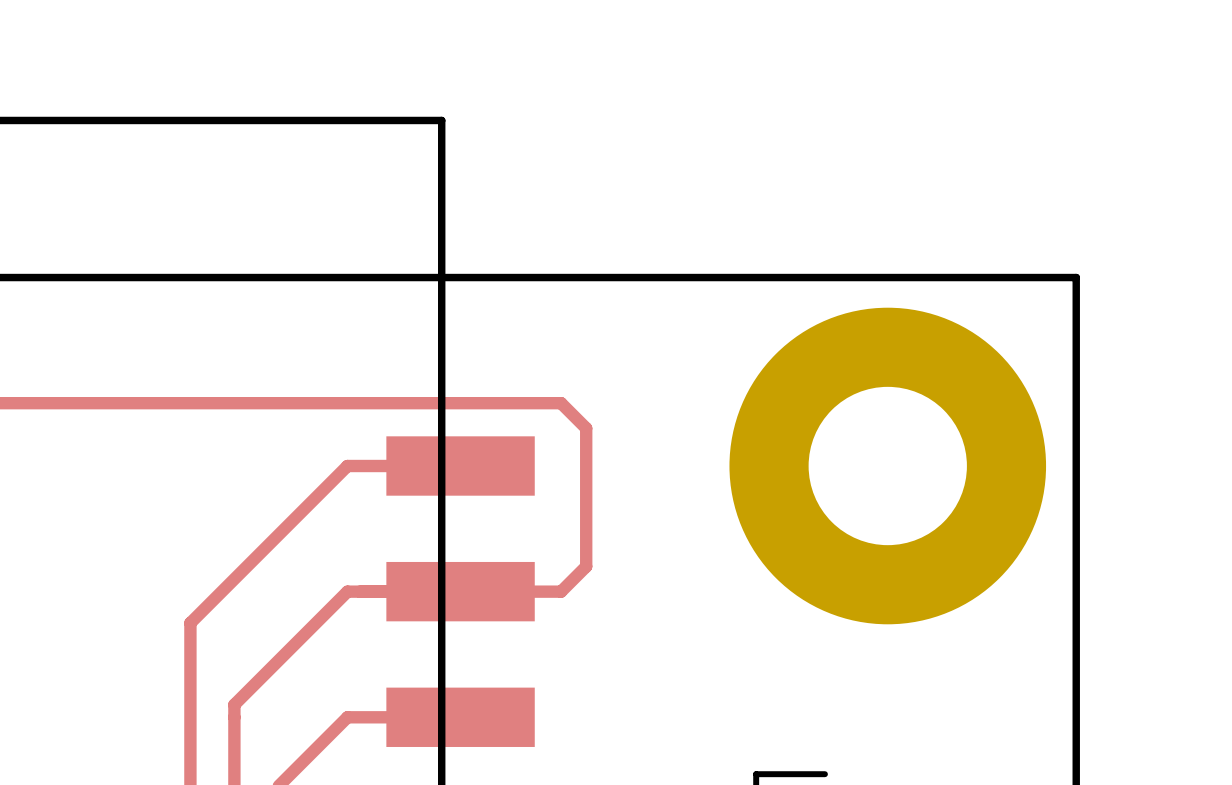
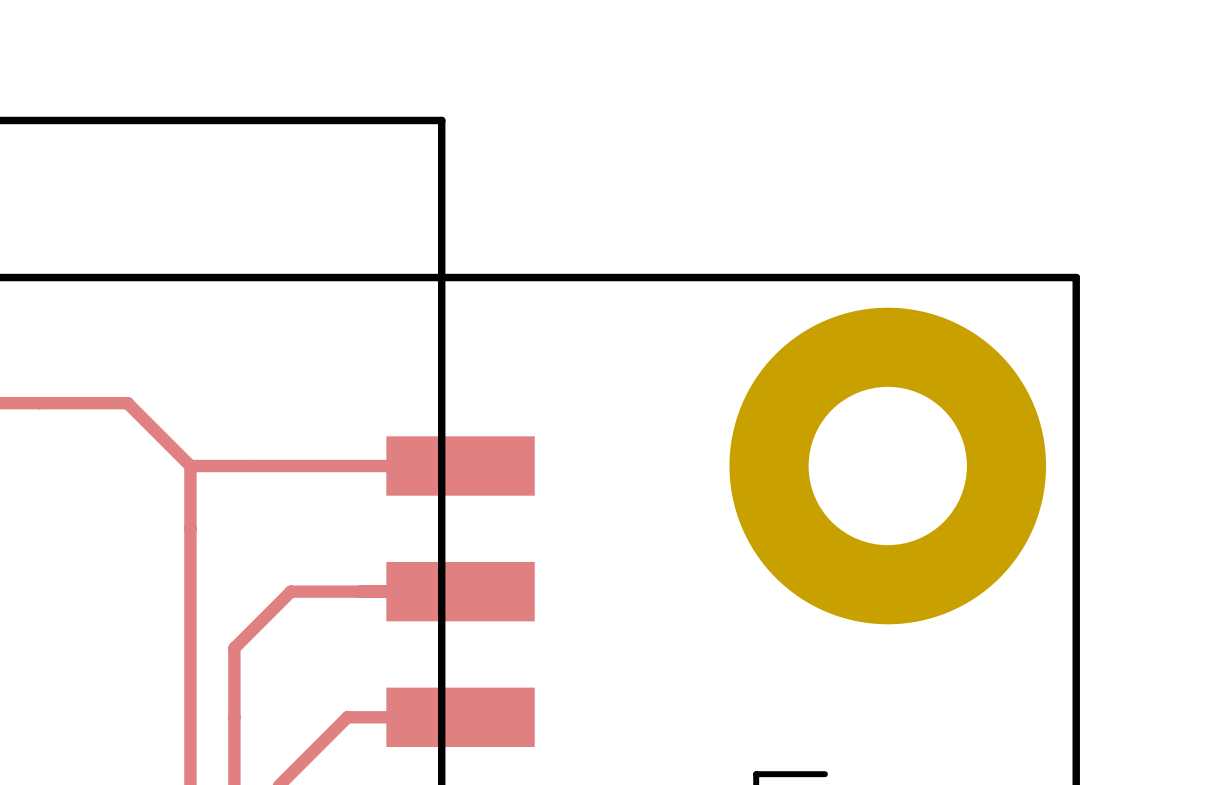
track: (127, 403) (561, 403) (586, 428) (586, 566) (561, 591) (460, 591) -> (127, 403) (190, 466)
track: none -> (190, 466) (190, 623)
track: (347, 466) (190, 623) -> (347, 466) (190, 466)
track: (347, 591) (234, 704) -> (347, 591) (290, 591) (234, 648) (234, 704)

